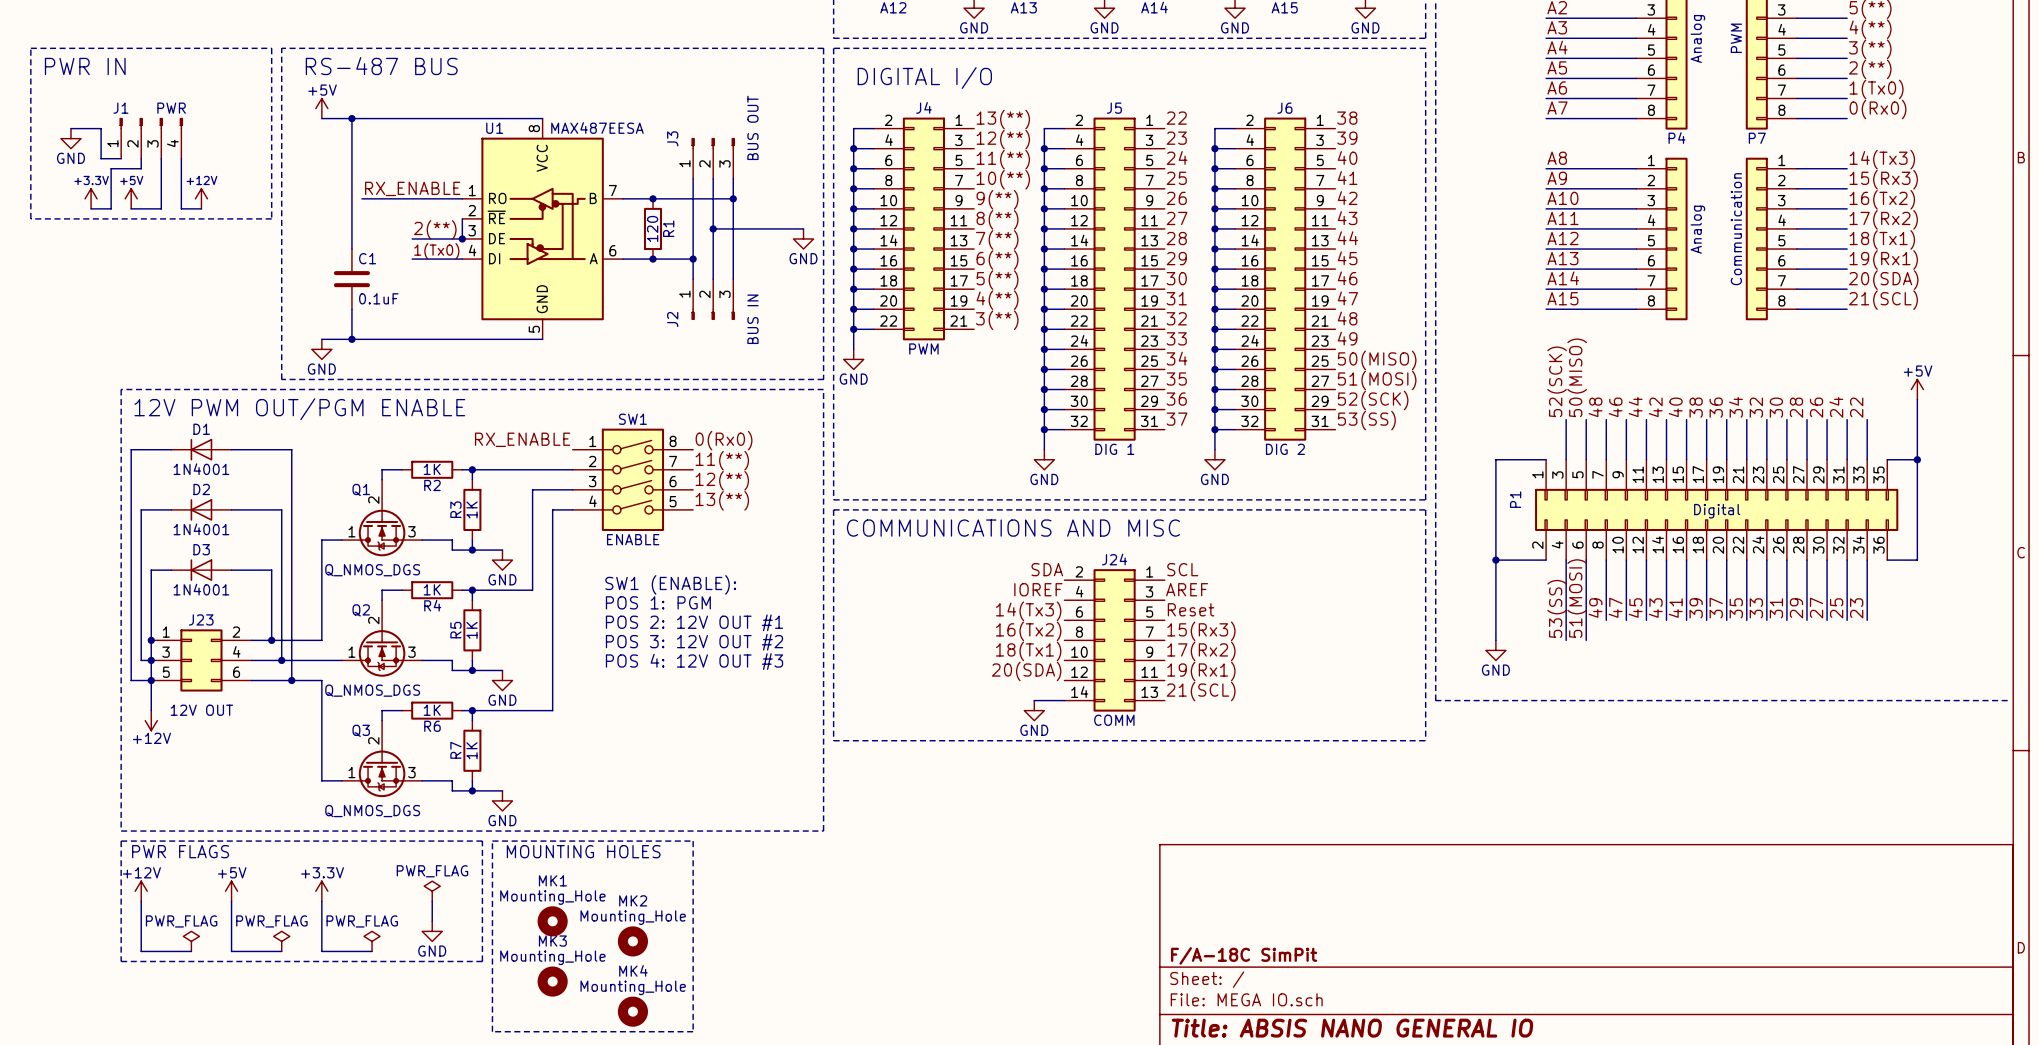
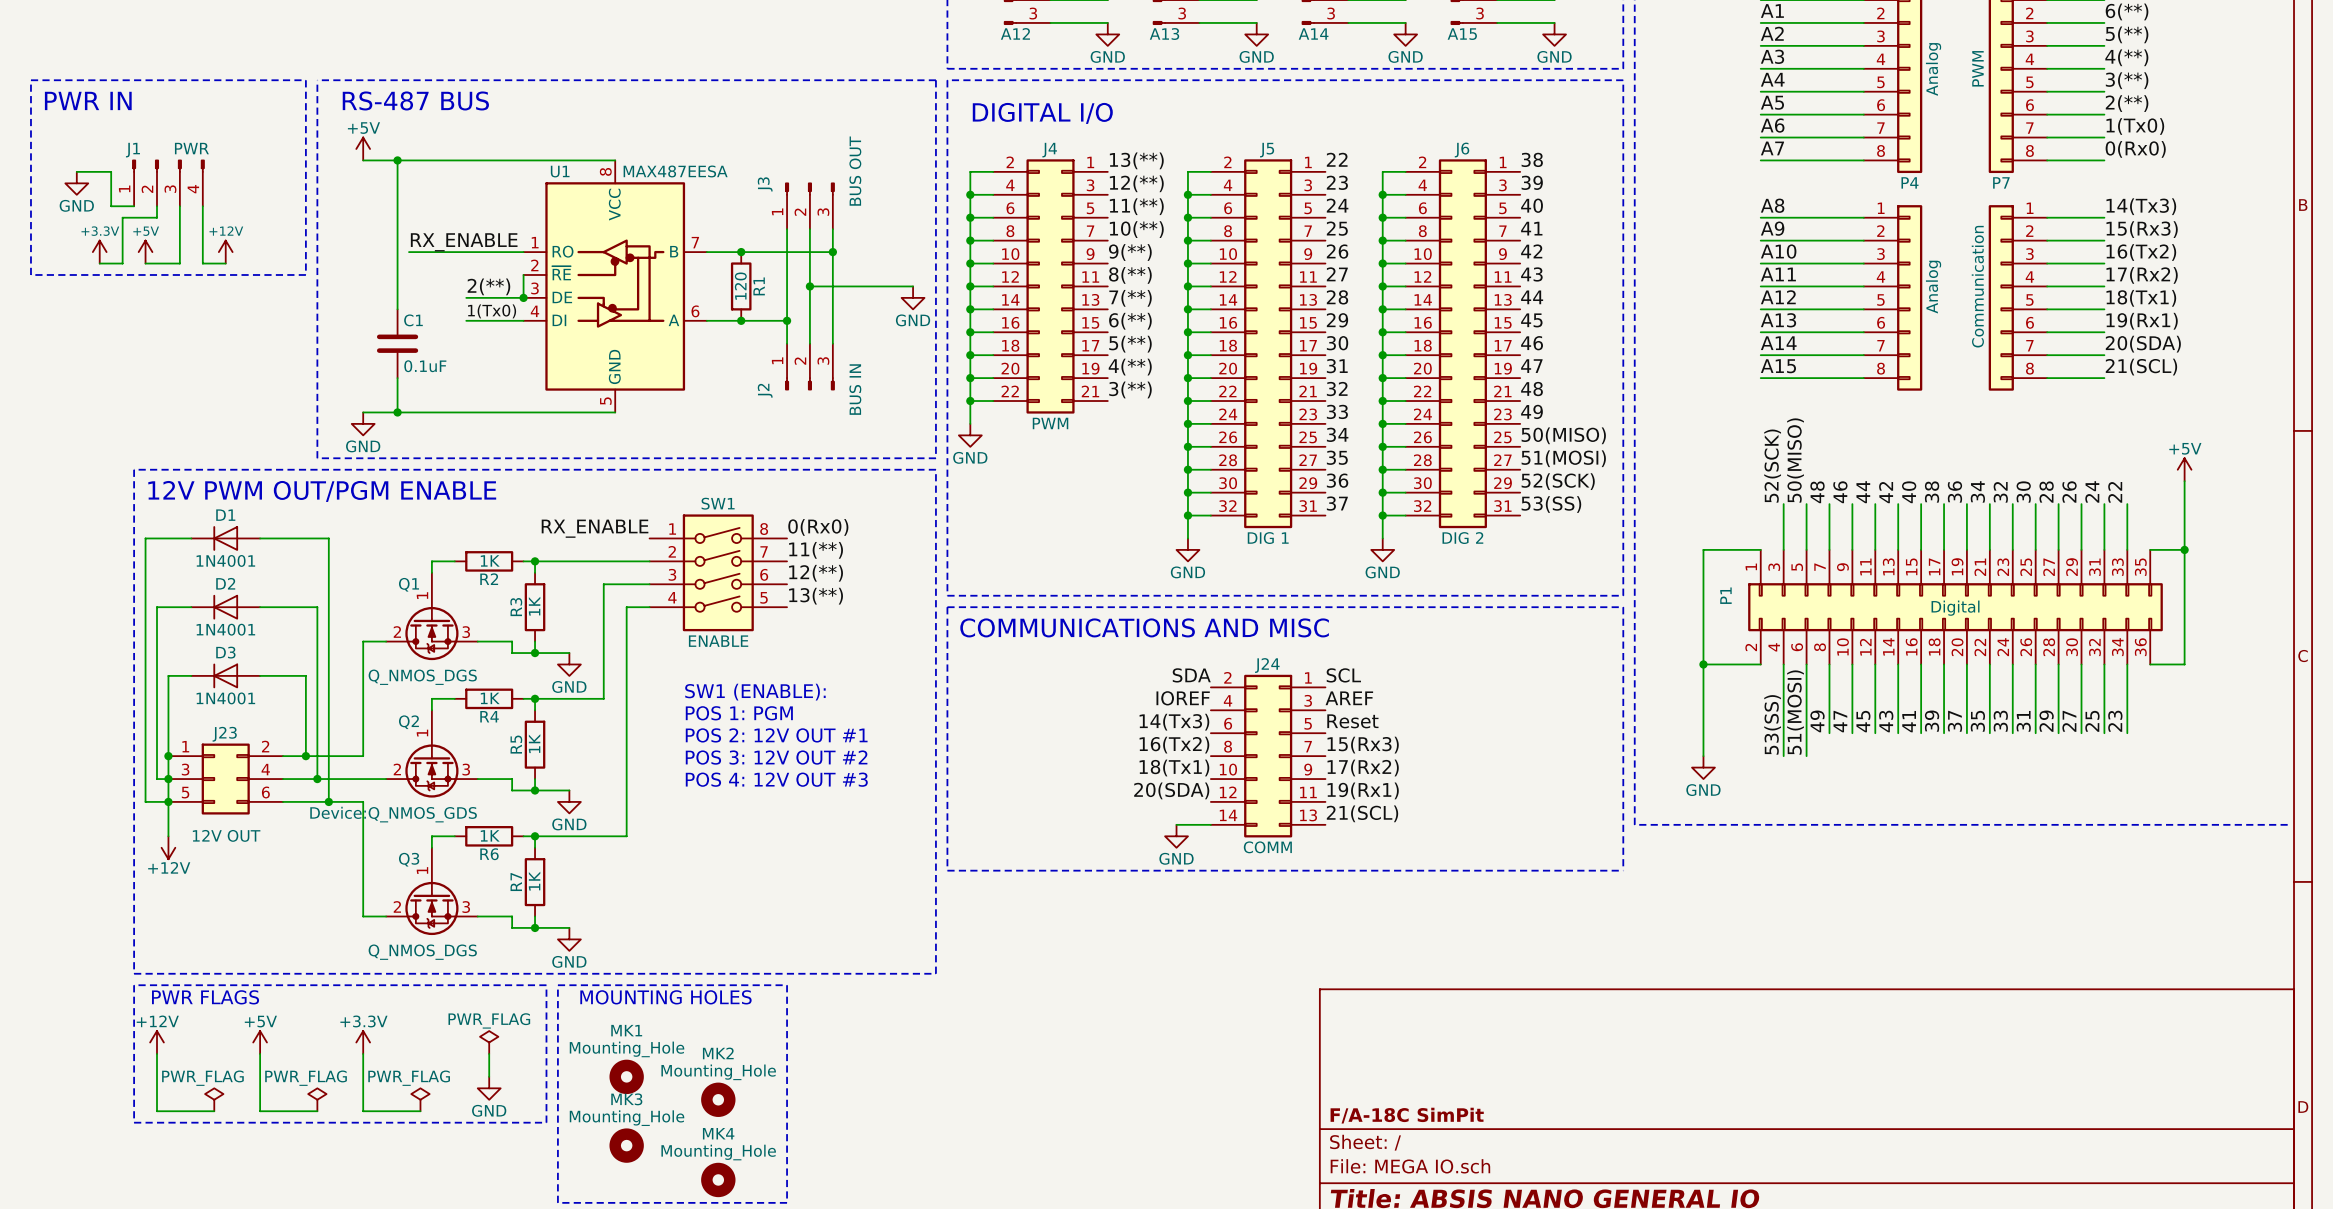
Q1 pin number: 2 (373, 500) -> 1 (422, 595)
Q1 pin number: 1 (351, 531) -> 2 (397, 632)
Q2 pin number: 2 (373, 620) -> 1 (422, 733)
Q2 pin number: 1 (351, 652) -> 2 (397, 769)
Q2 value: Q_NMOS_DGS (372, 690) -> Device:Q_NMOS_GDS (393, 814)
Q3 pin number: 2 (373, 740) -> 1 (422, 870)
Q3 pin number: 1 (351, 772) -> 2 (397, 906)

